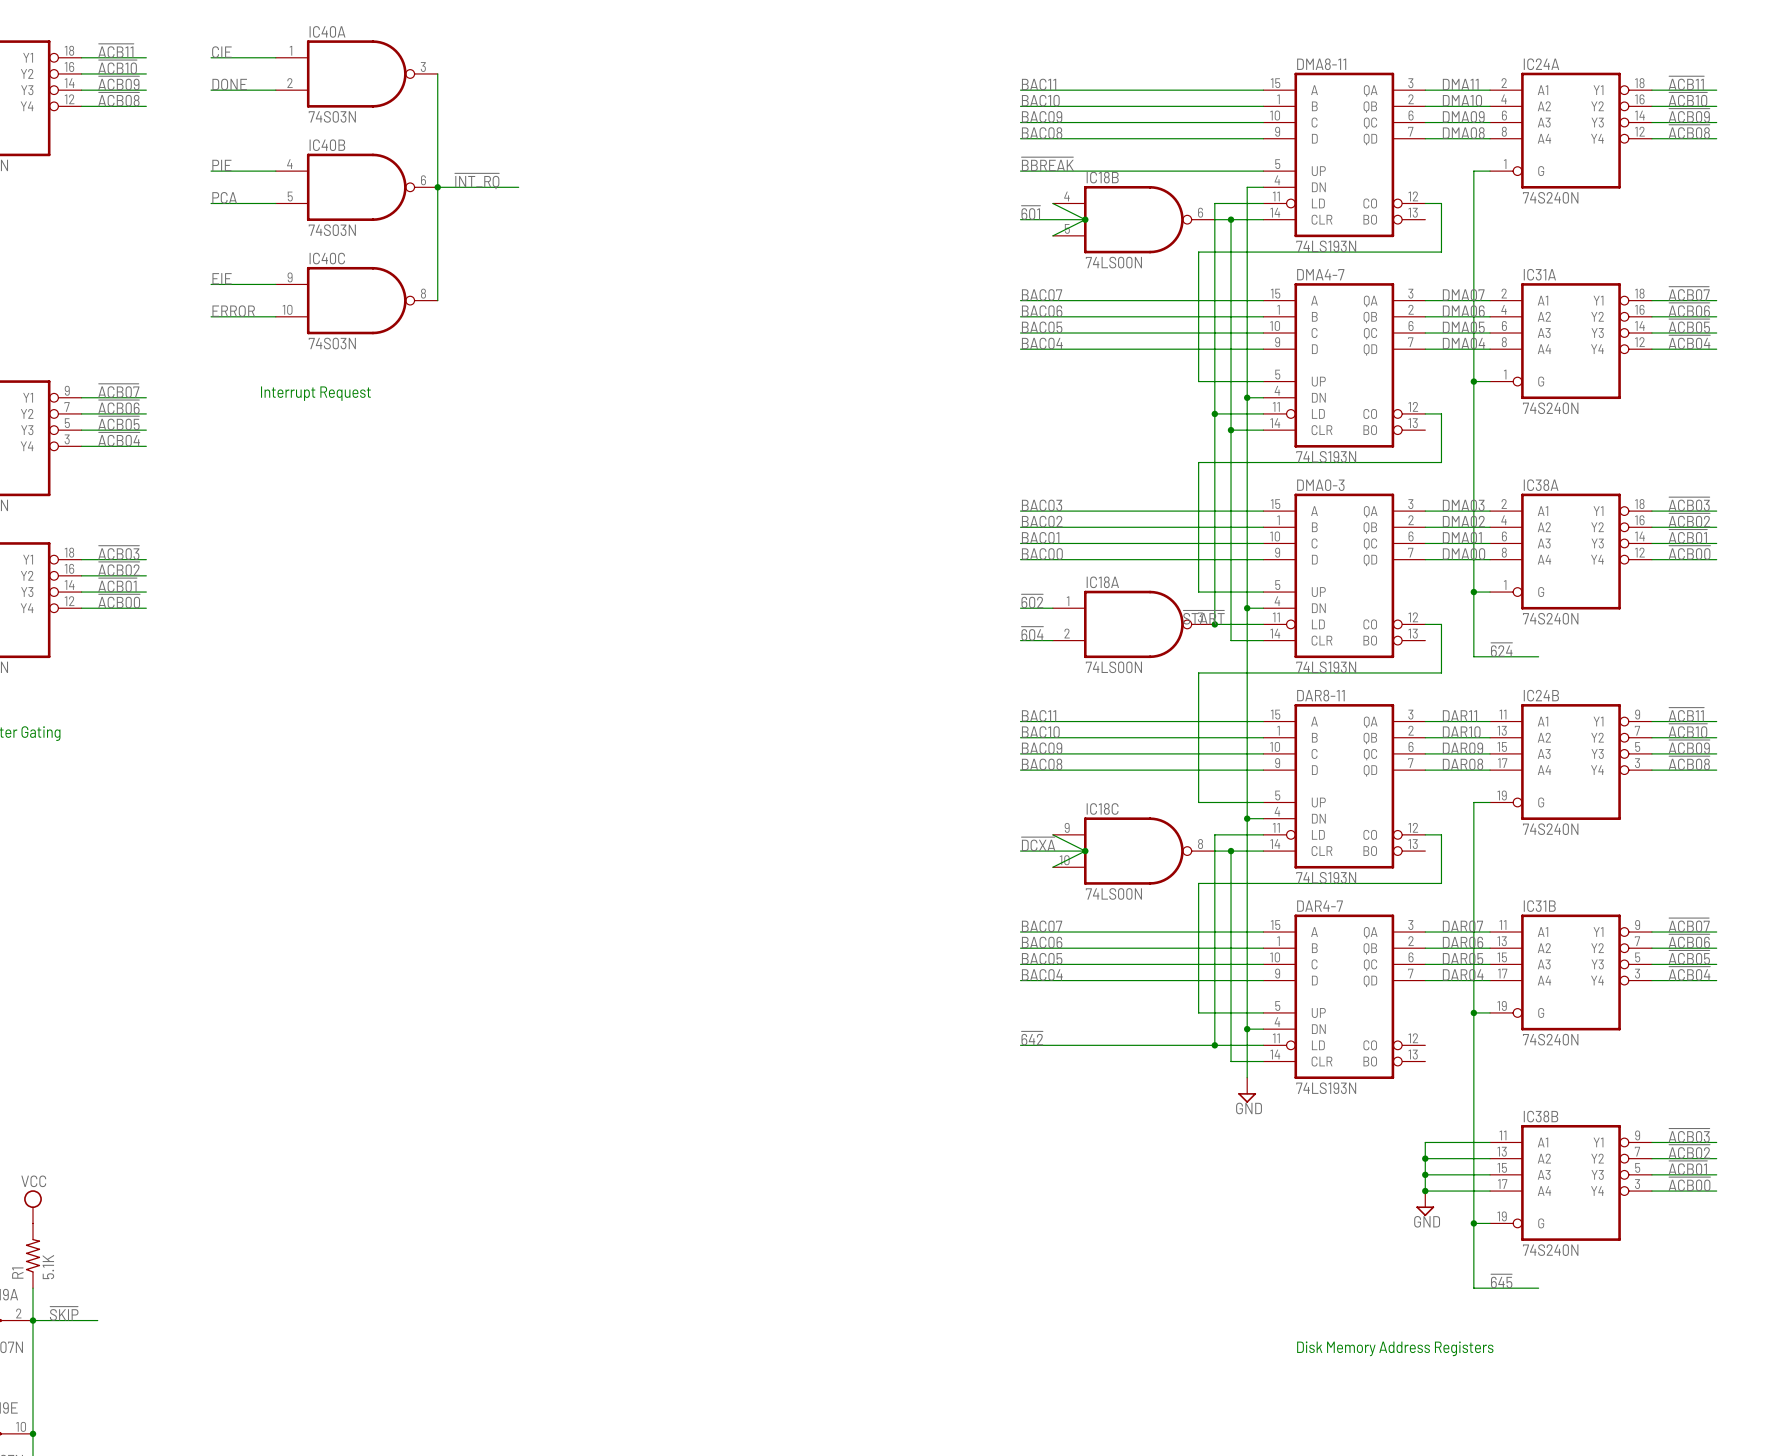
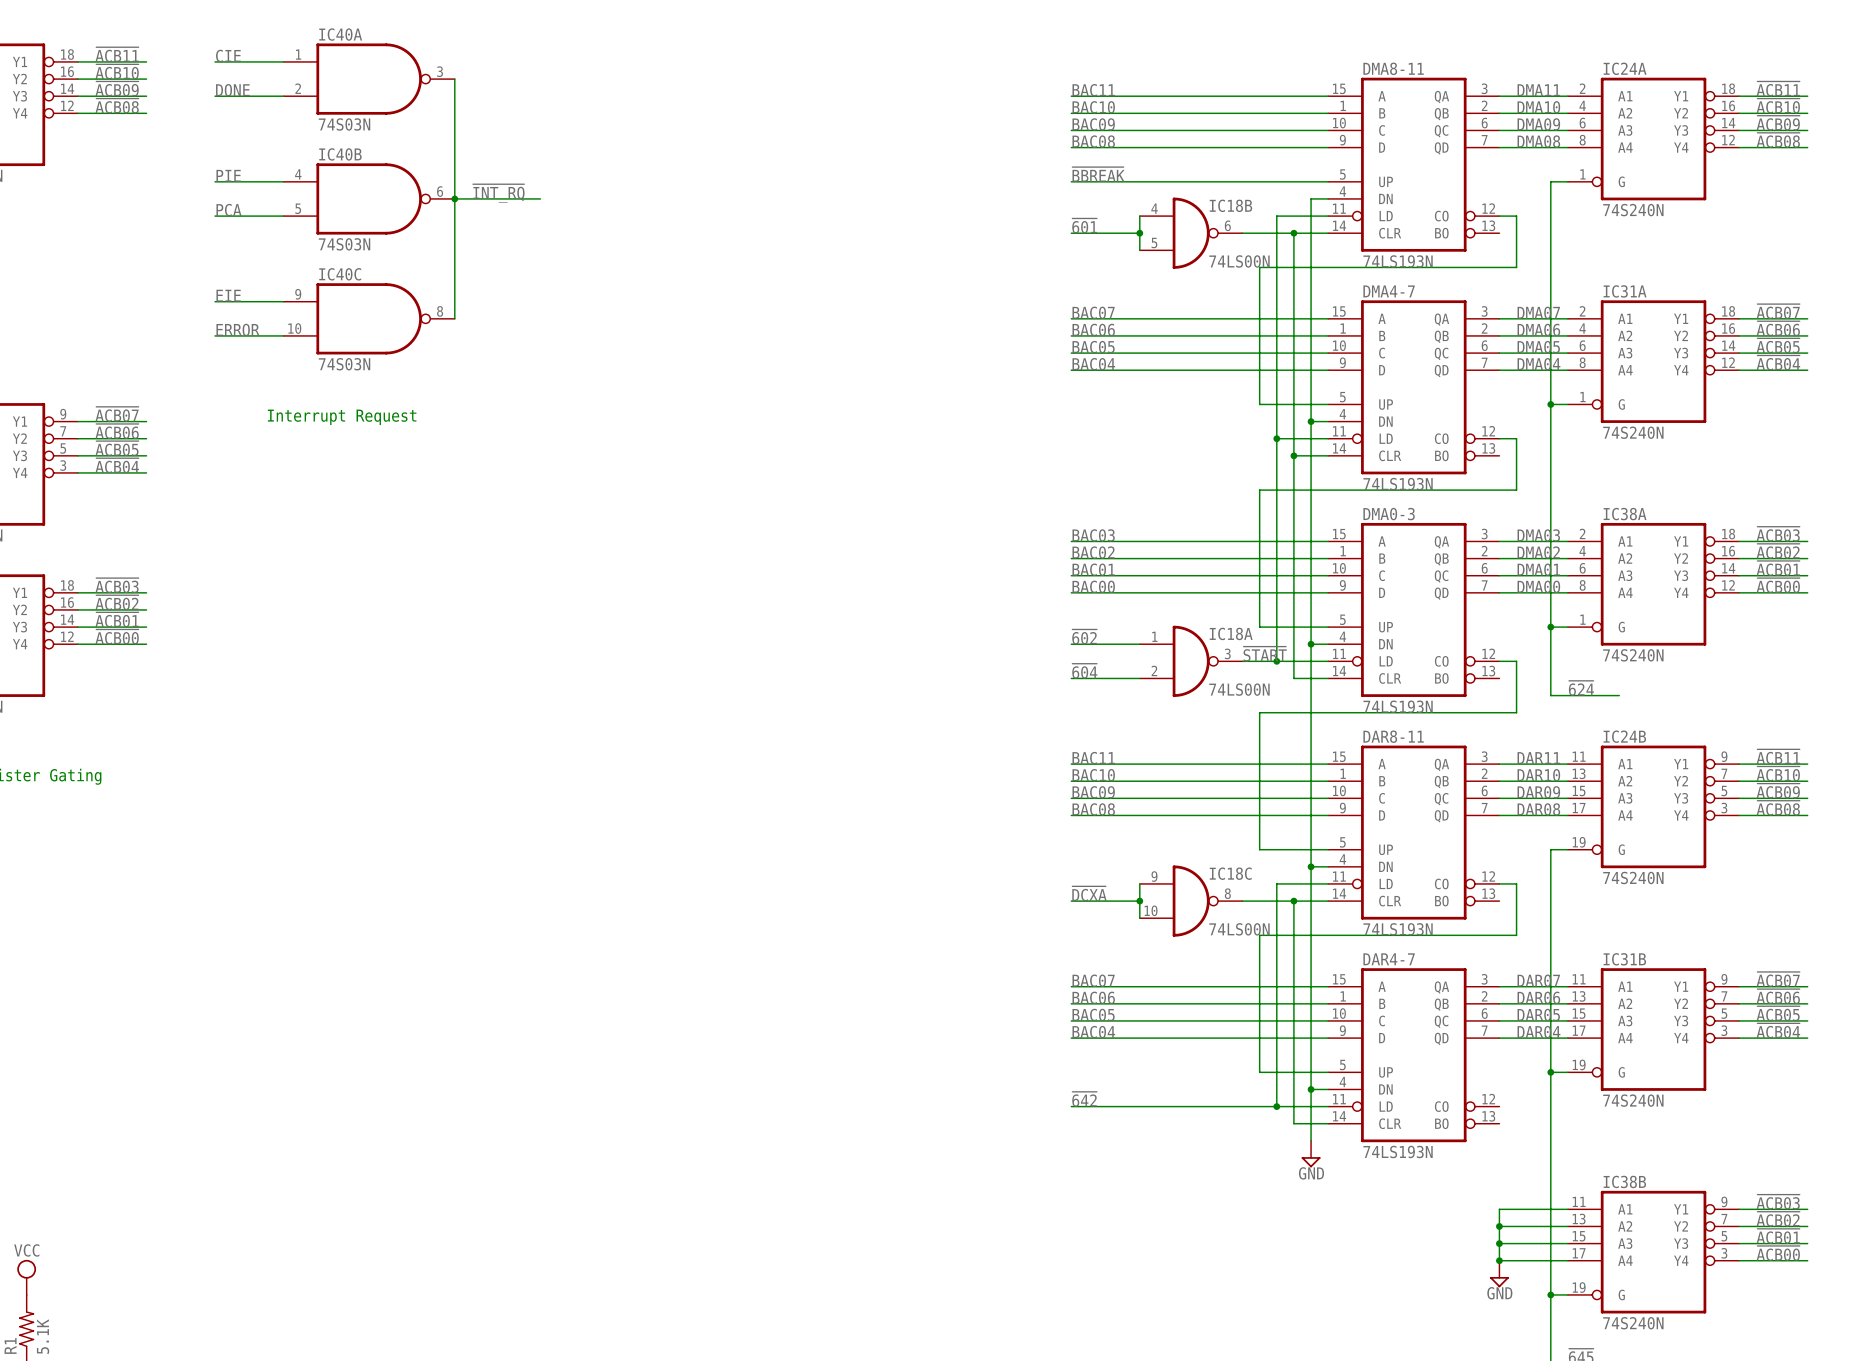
IC18B name position: IC18B (1102, 177) -> IC18B (1230, 205)
IC18B symbol: [1052, 186, 1215, 254] -> [1139, 197, 1243, 269]
wire: (1052, 203) (1085, 219) (1052, 235) -> none
IC18B value position: 74LS00N (1113, 262) -> 74LS00N (1239, 261)
IC18A name position: IC18A (1102, 582) -> IC18A (1231, 633)
IC18A symbol: [1052, 590, 1215, 659] -> [1139, 625, 1243, 697]
IC18A value position: 74LS00N (1113, 667) -> 74LS00N (1239, 689)
IC18C name position: IC18C (1102, 808) -> IC18C (1230, 873)
IC18C symbol: [1052, 817, 1215, 885] -> [1139, 865, 1243, 937]
wire: (1052, 834) (1085, 851) (1052, 867) -> none
IC18C value position: 74LS00N (1113, 893) -> 74LS00N (1239, 929)

